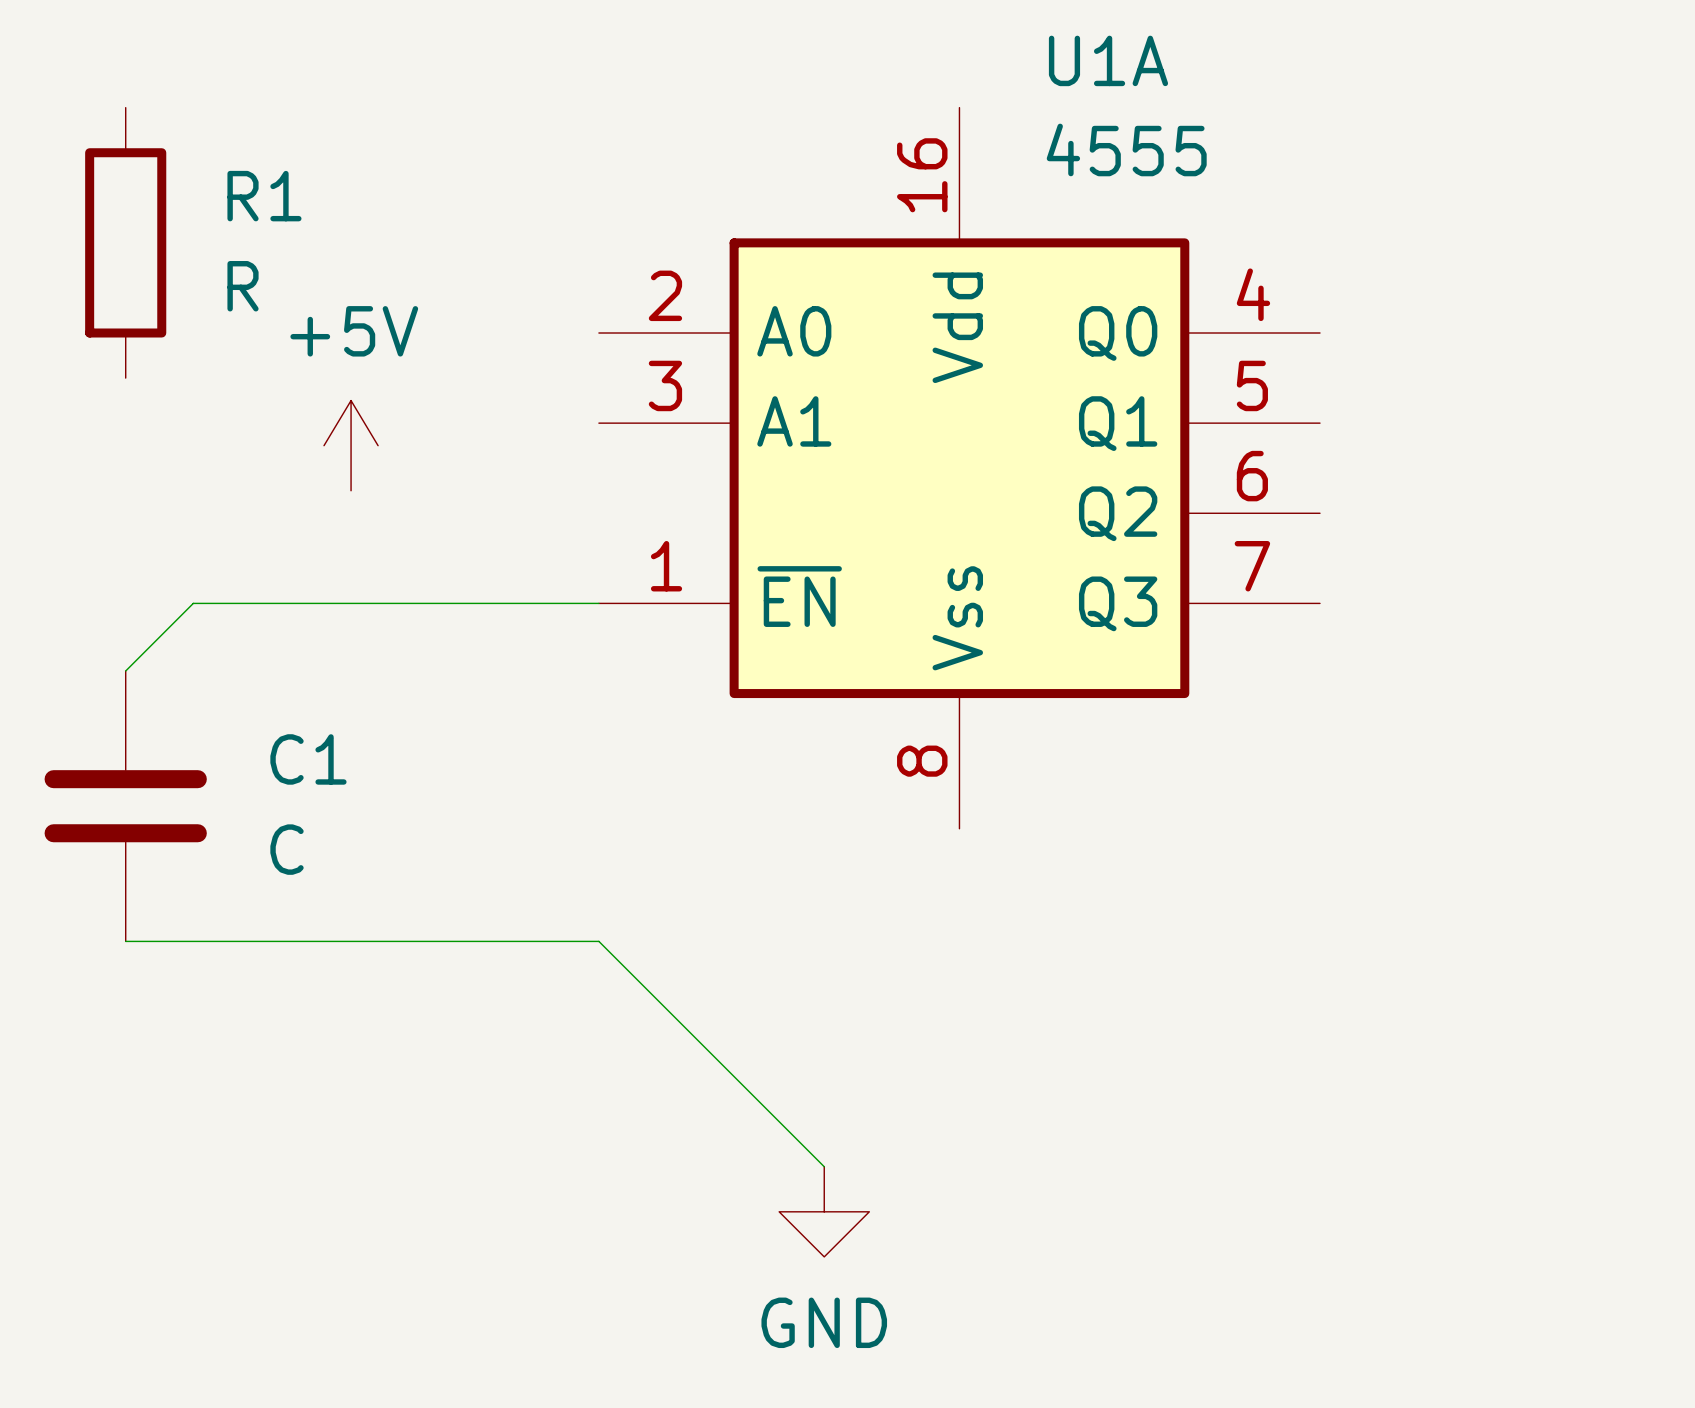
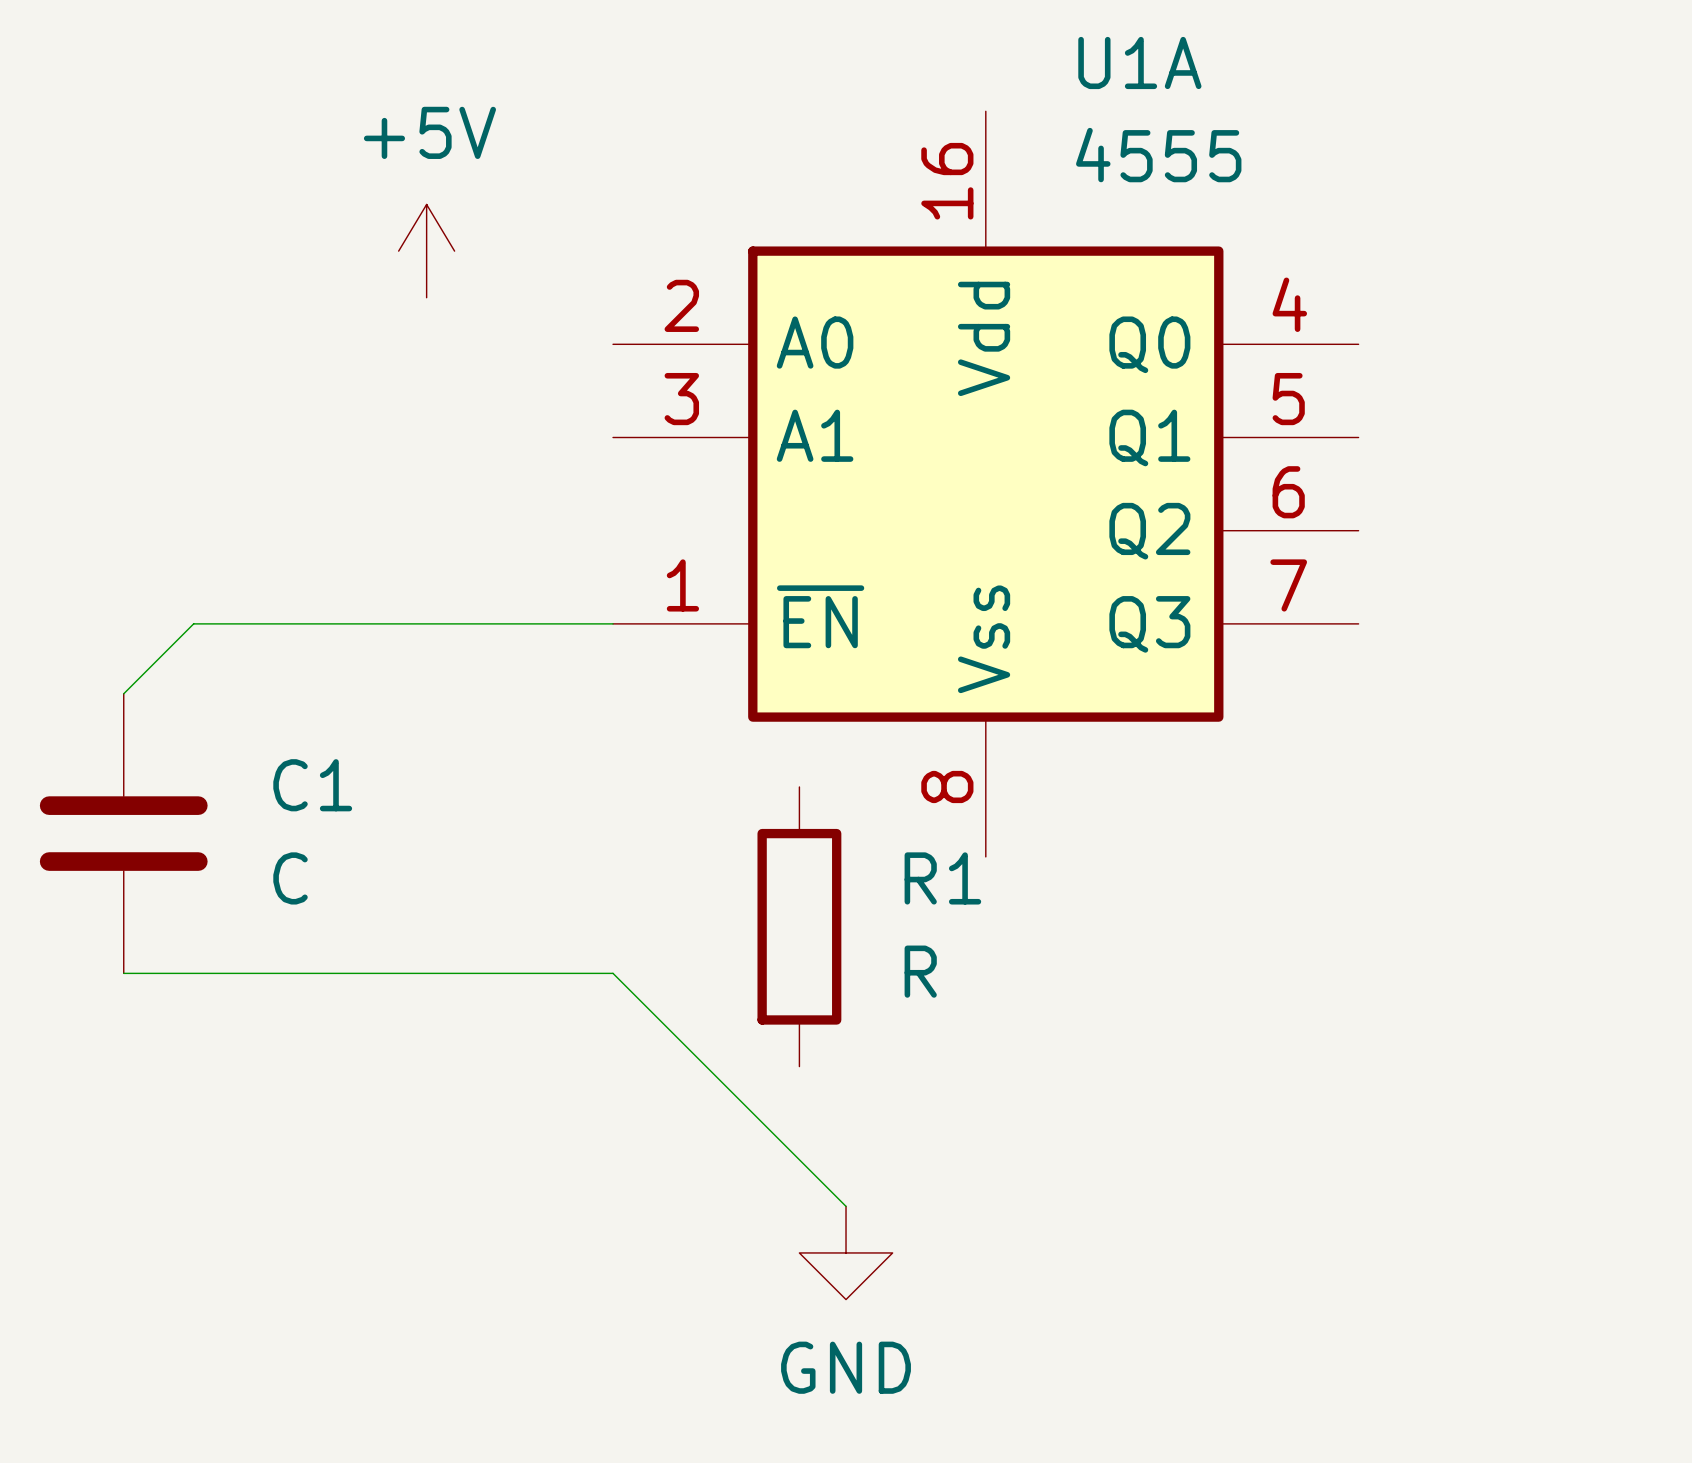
R1 position: (125, 242) -> (799, 926)
power symbol position: +5V (351, 445) -> +5V (426, 251)

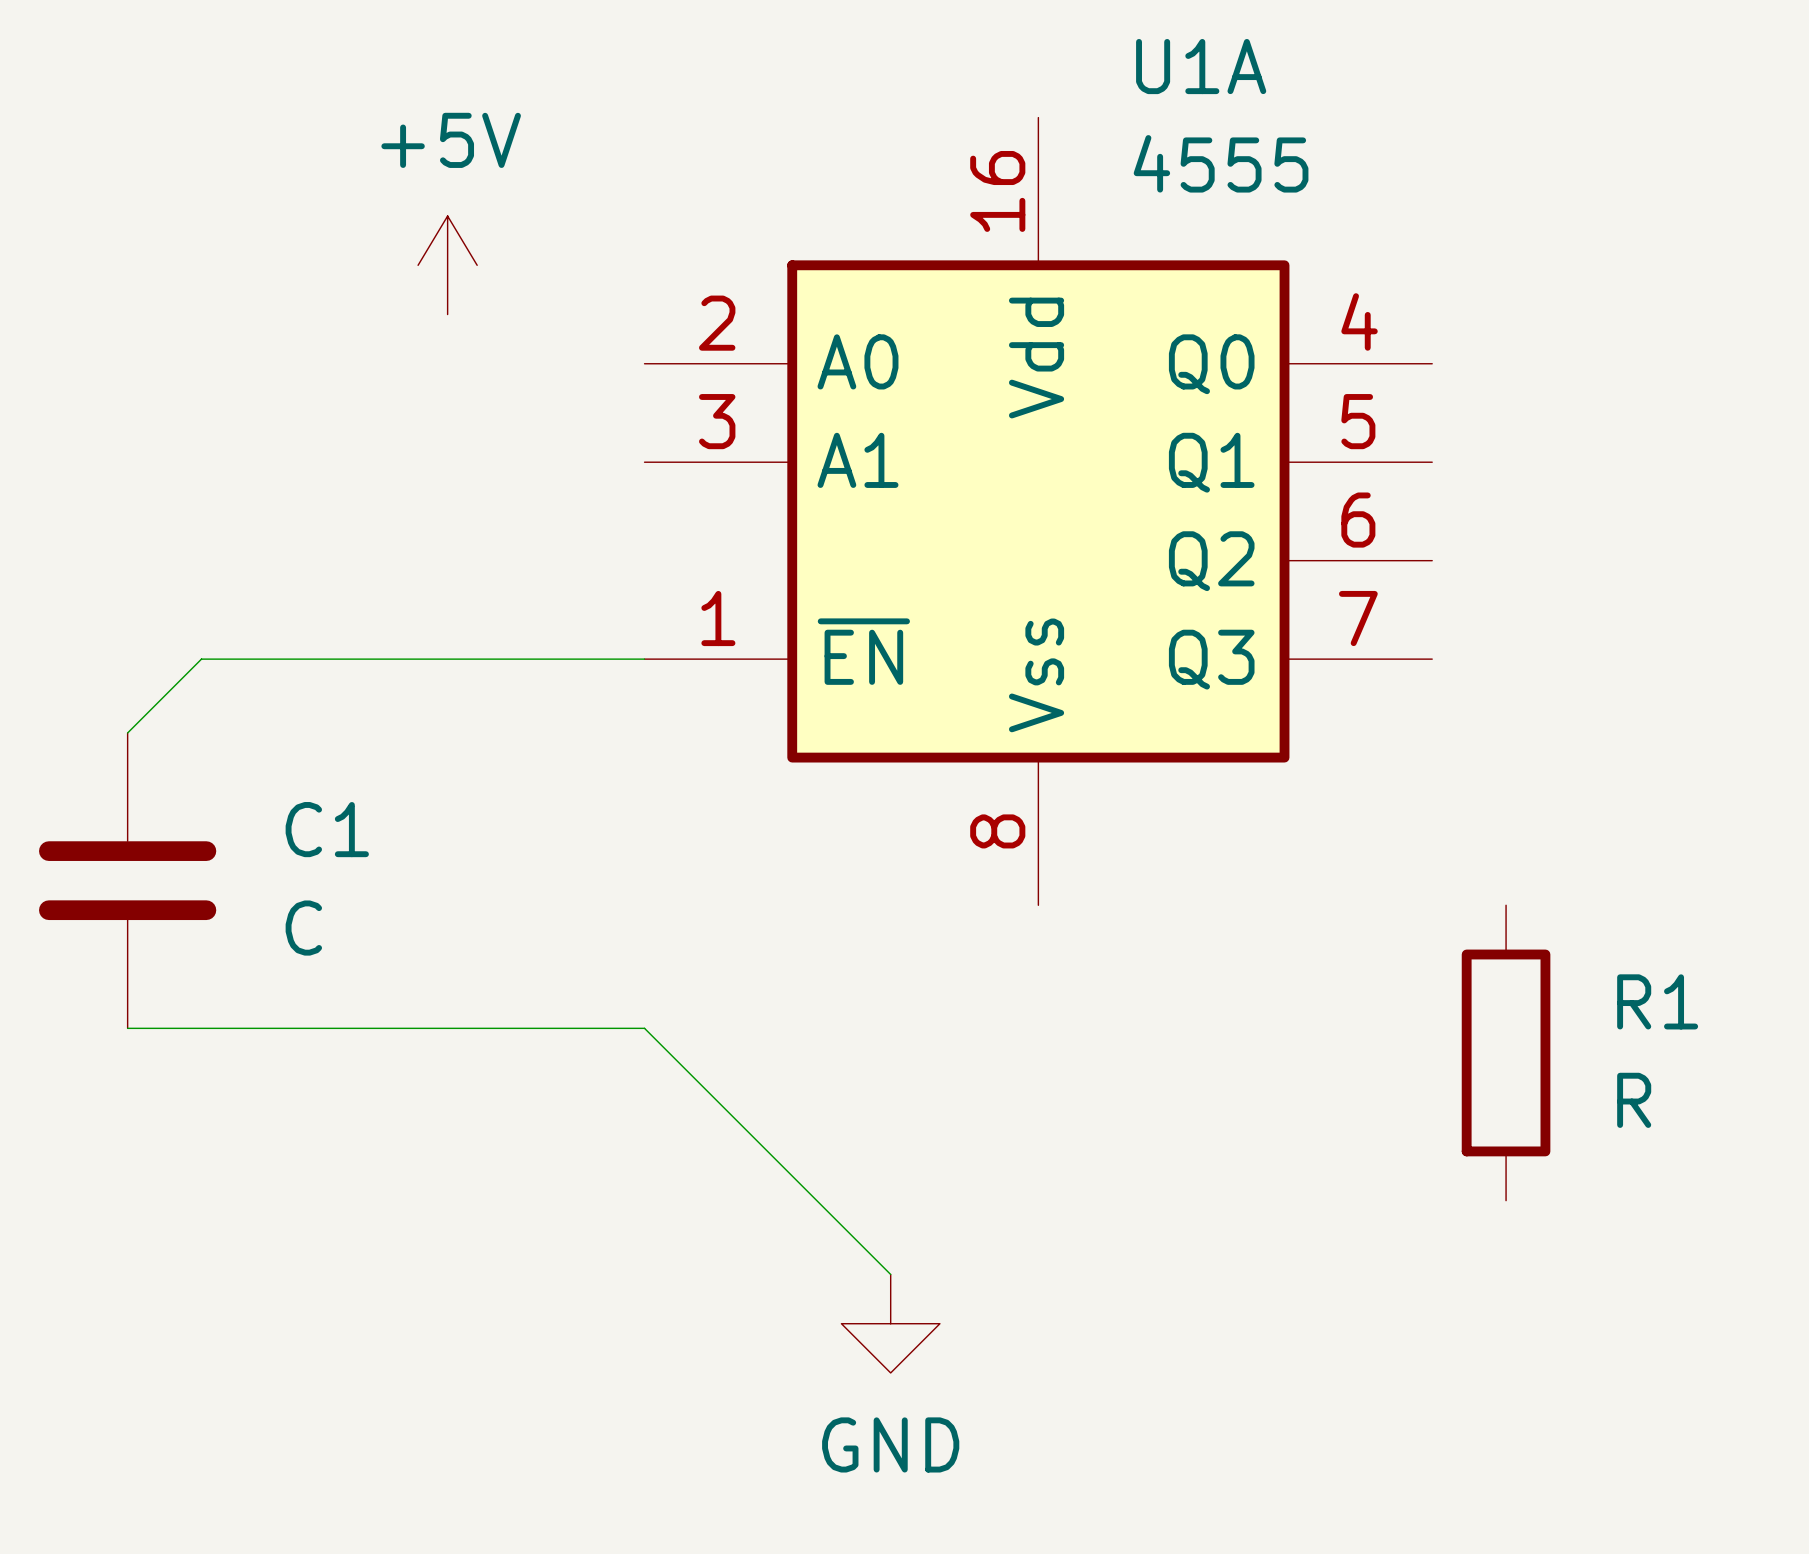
R1 position: (799, 926) -> (1506, 1052)

